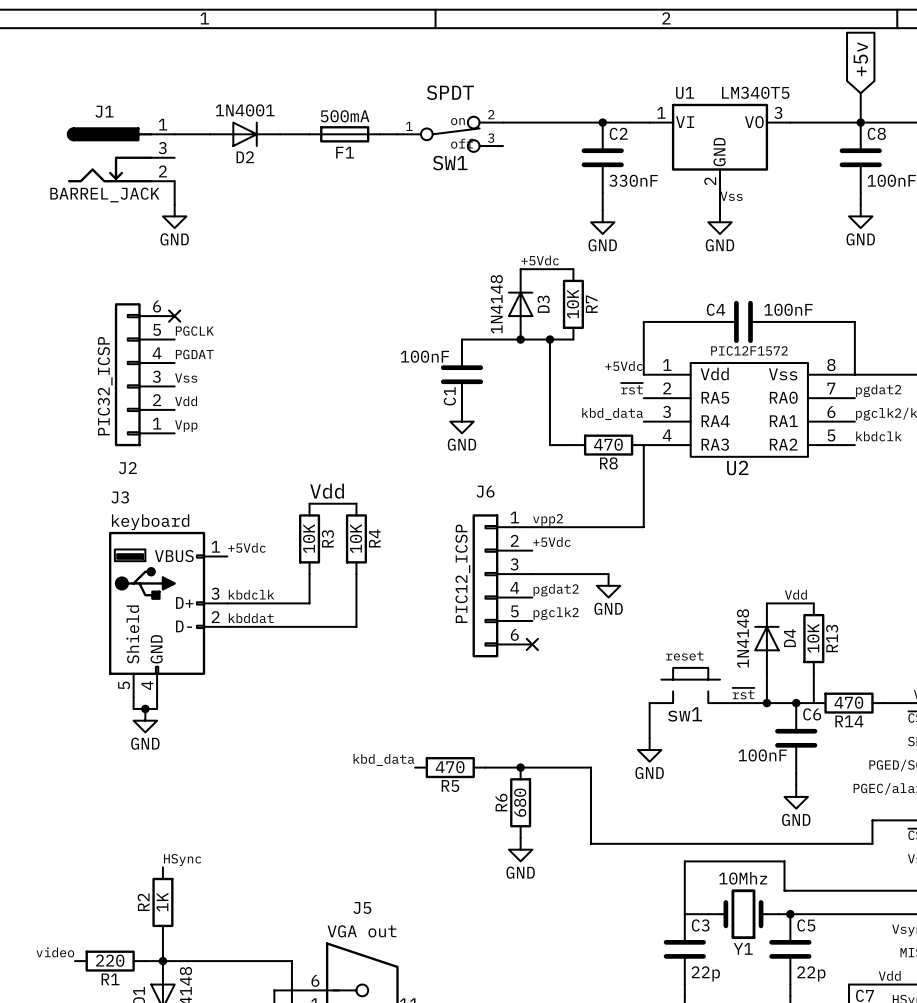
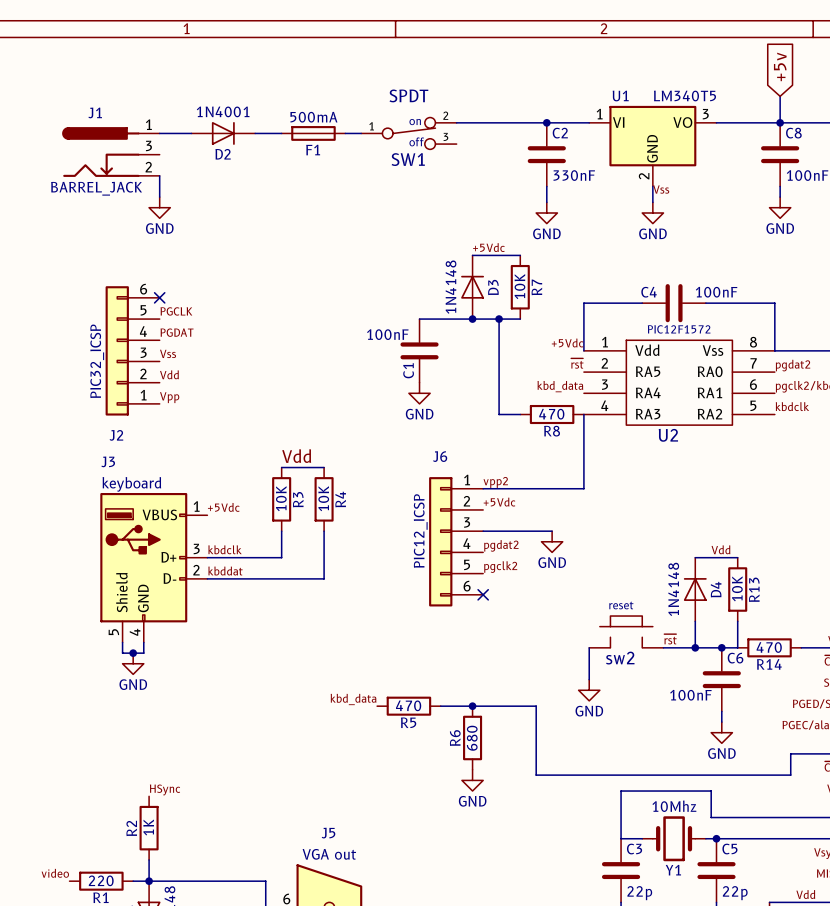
sw1 name: sw1 (685, 714) -> sw2 (620, 658)

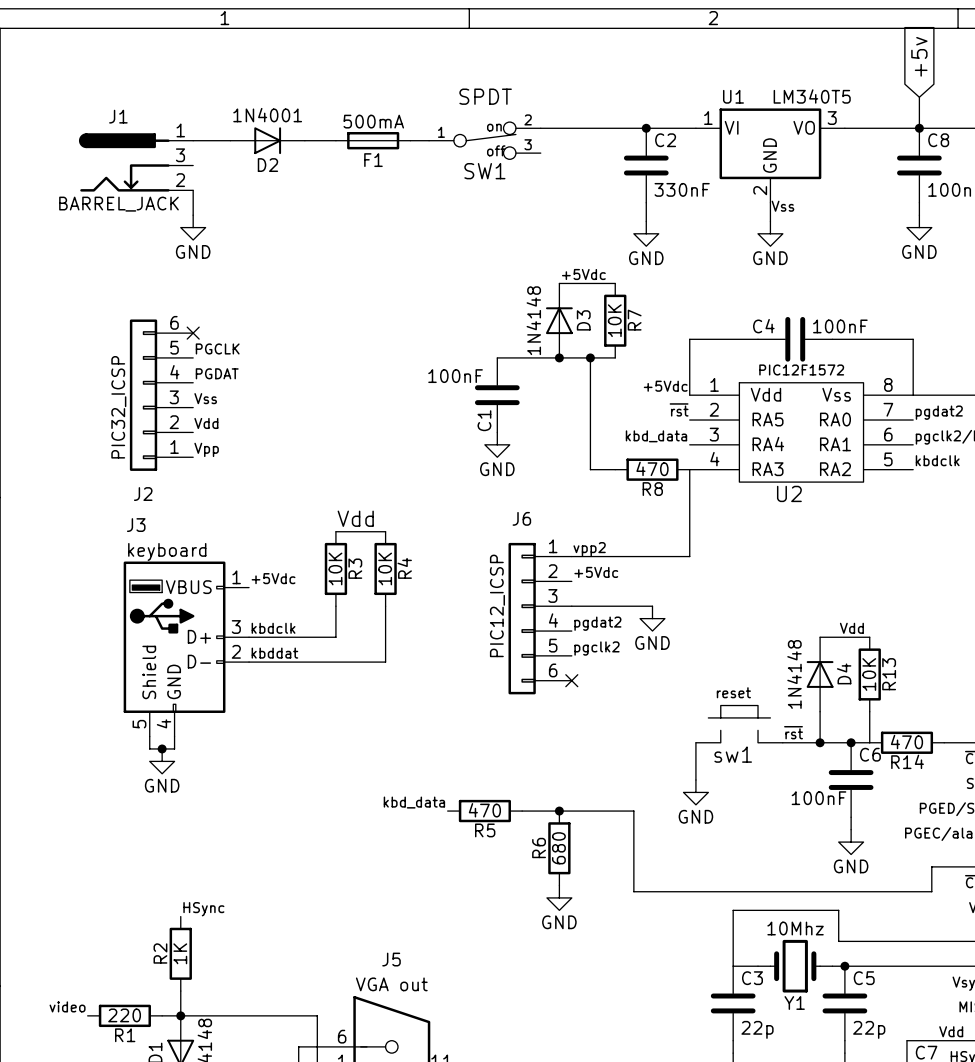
sw2 name: sw2 (620, 658) -> sw1 (733, 754)

